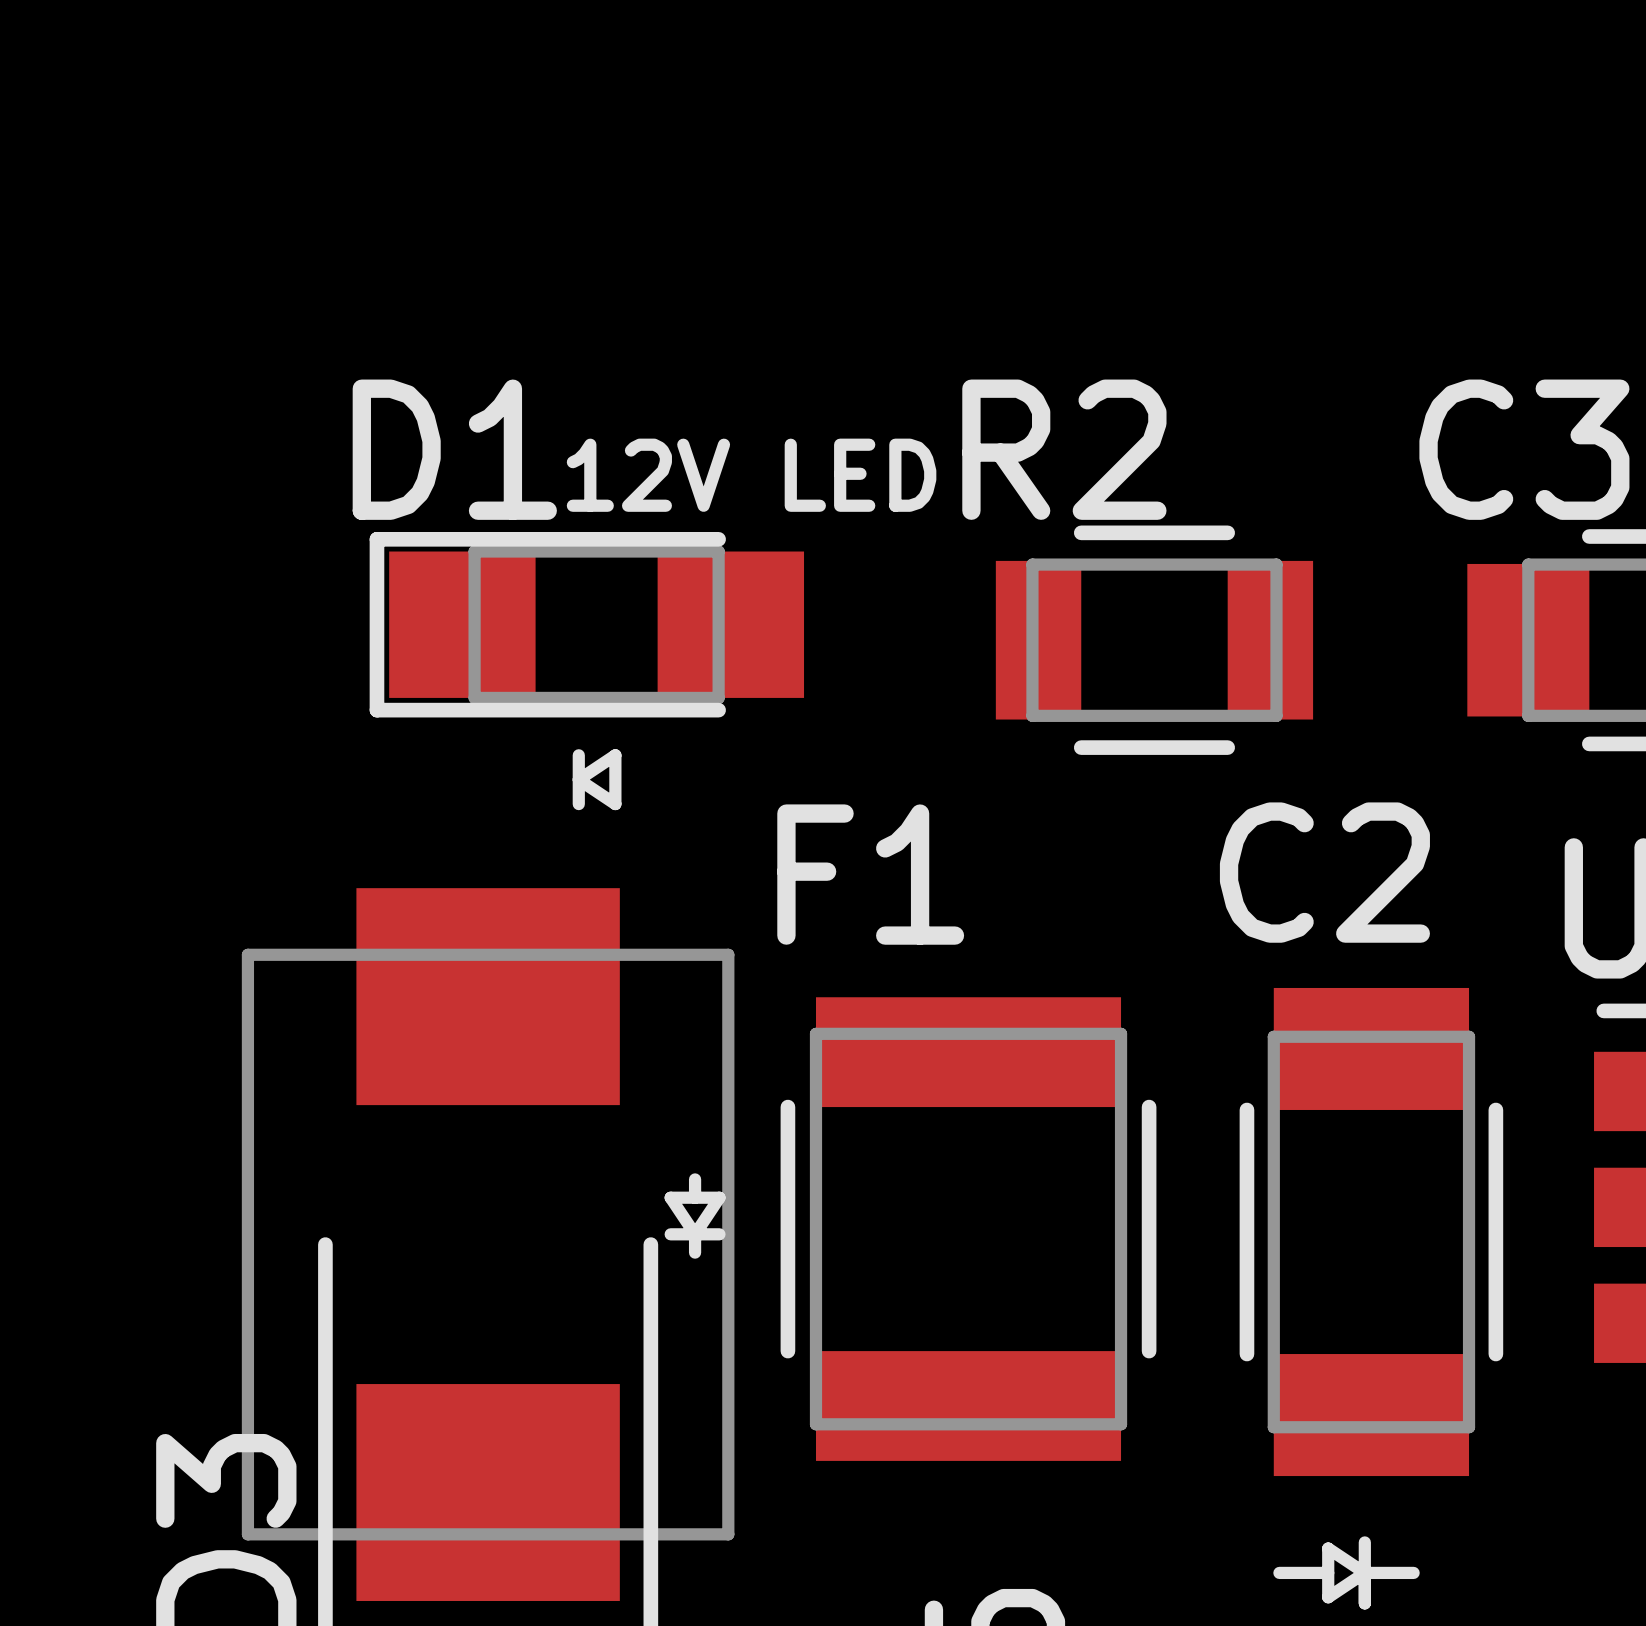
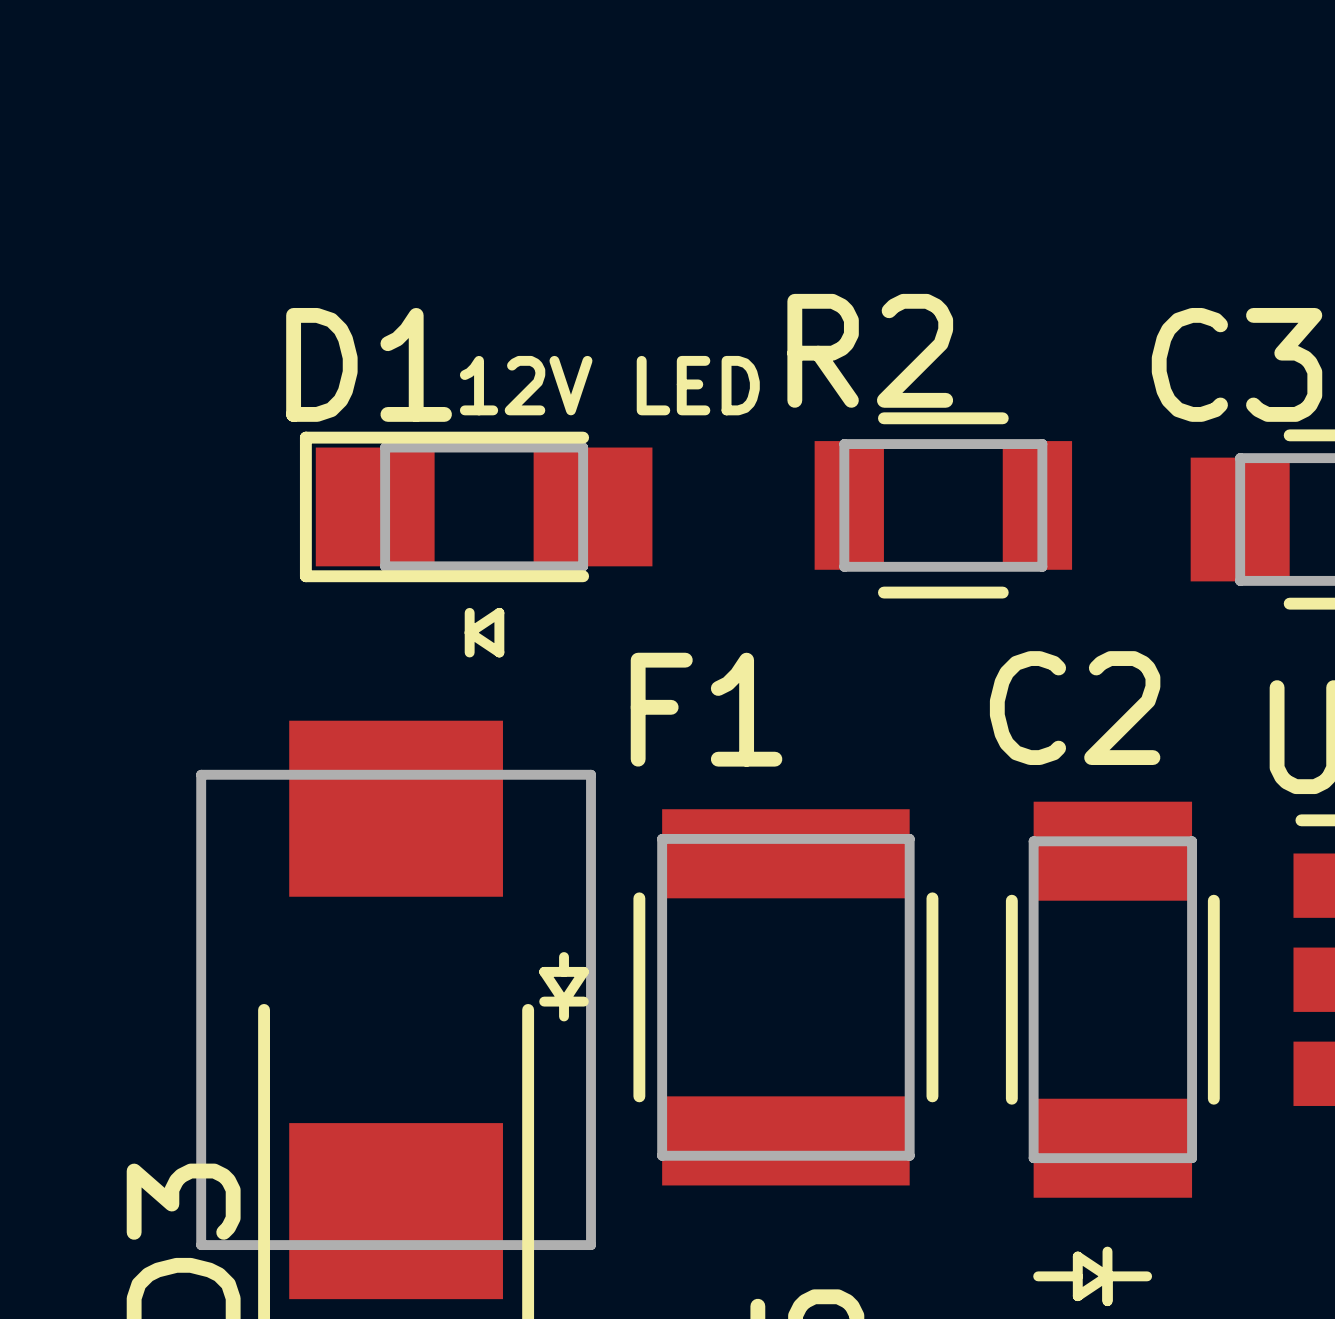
R2 position: (1154, 640) -> (943, 505)

